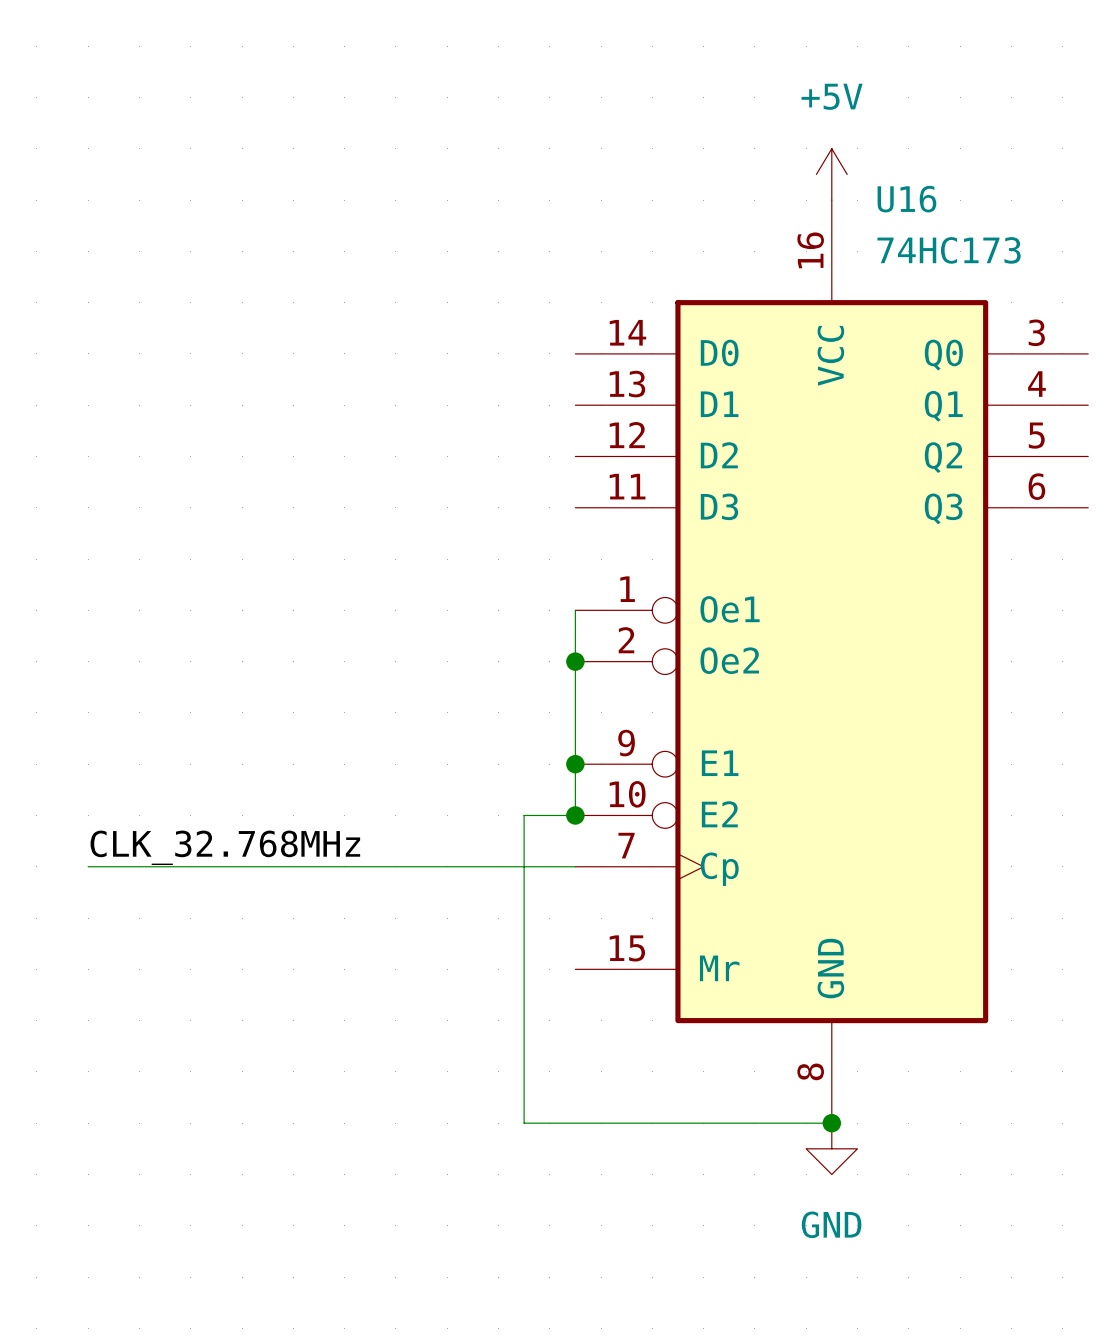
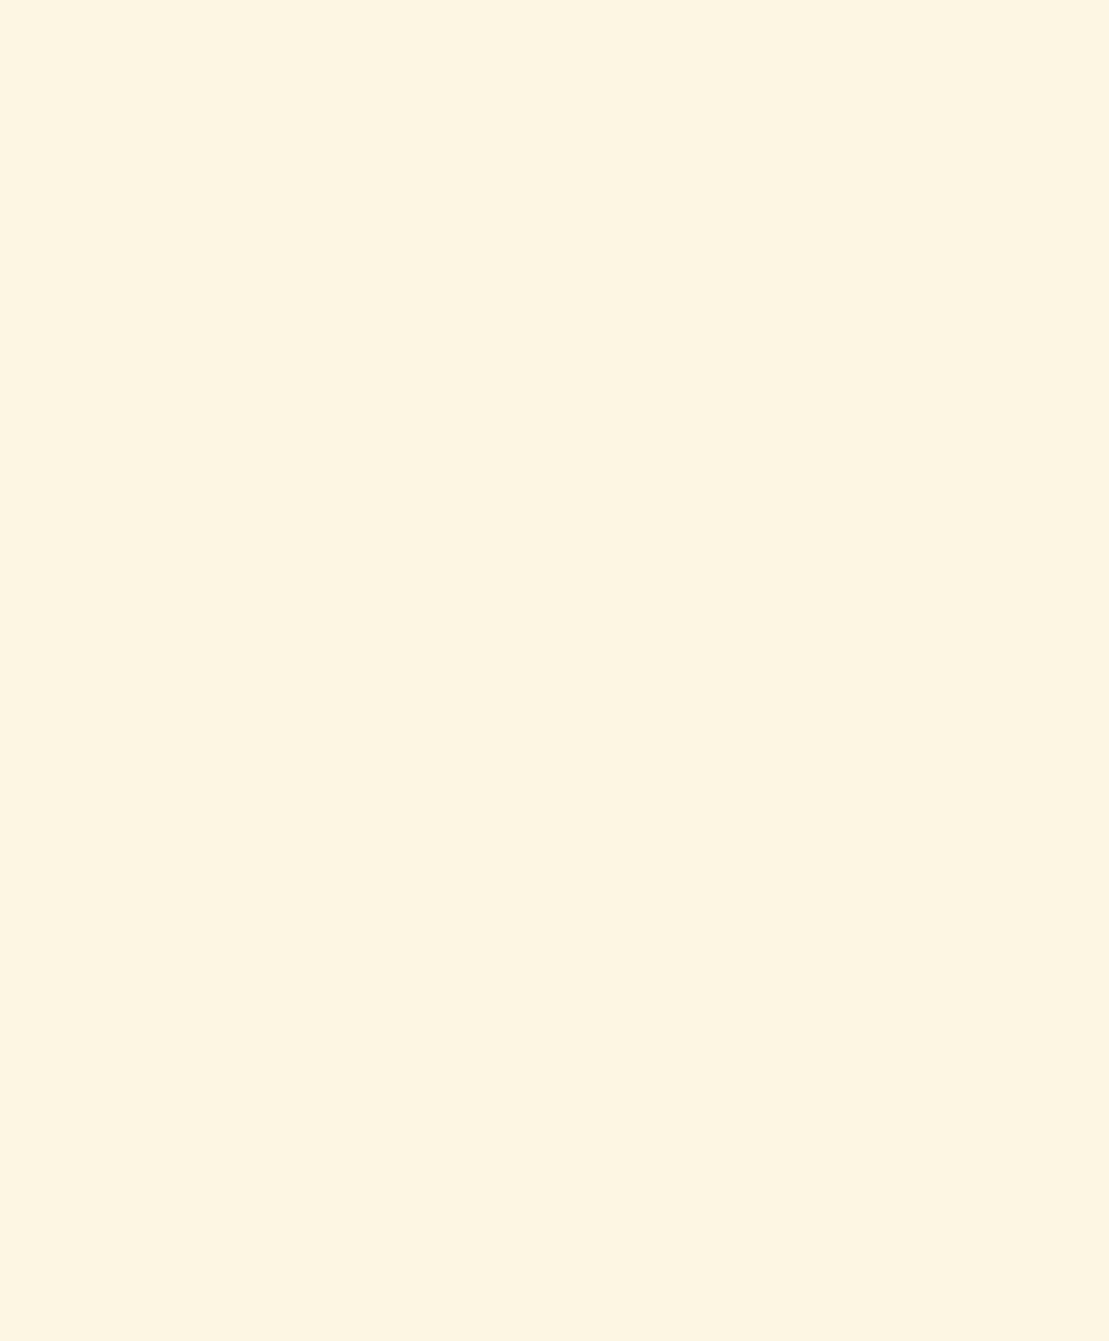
power symbol: +5V (831, 174) -> none
wire: (575, 610) (575, 815) (524, 815) (524, 1123) (831, 1123) -> none
junction: (575, 661) -> none
U16: 74HC173 (831, 661) -> none
junction: (575, 764) -> none
junction: (575, 815) -> none
label: CLK_32.768MHz (225, 847) -> none
wire: (88, 866) (575, 866) -> none
junction: (831, 1123) -> none
power symbol: GND (831, 1148) -> none

